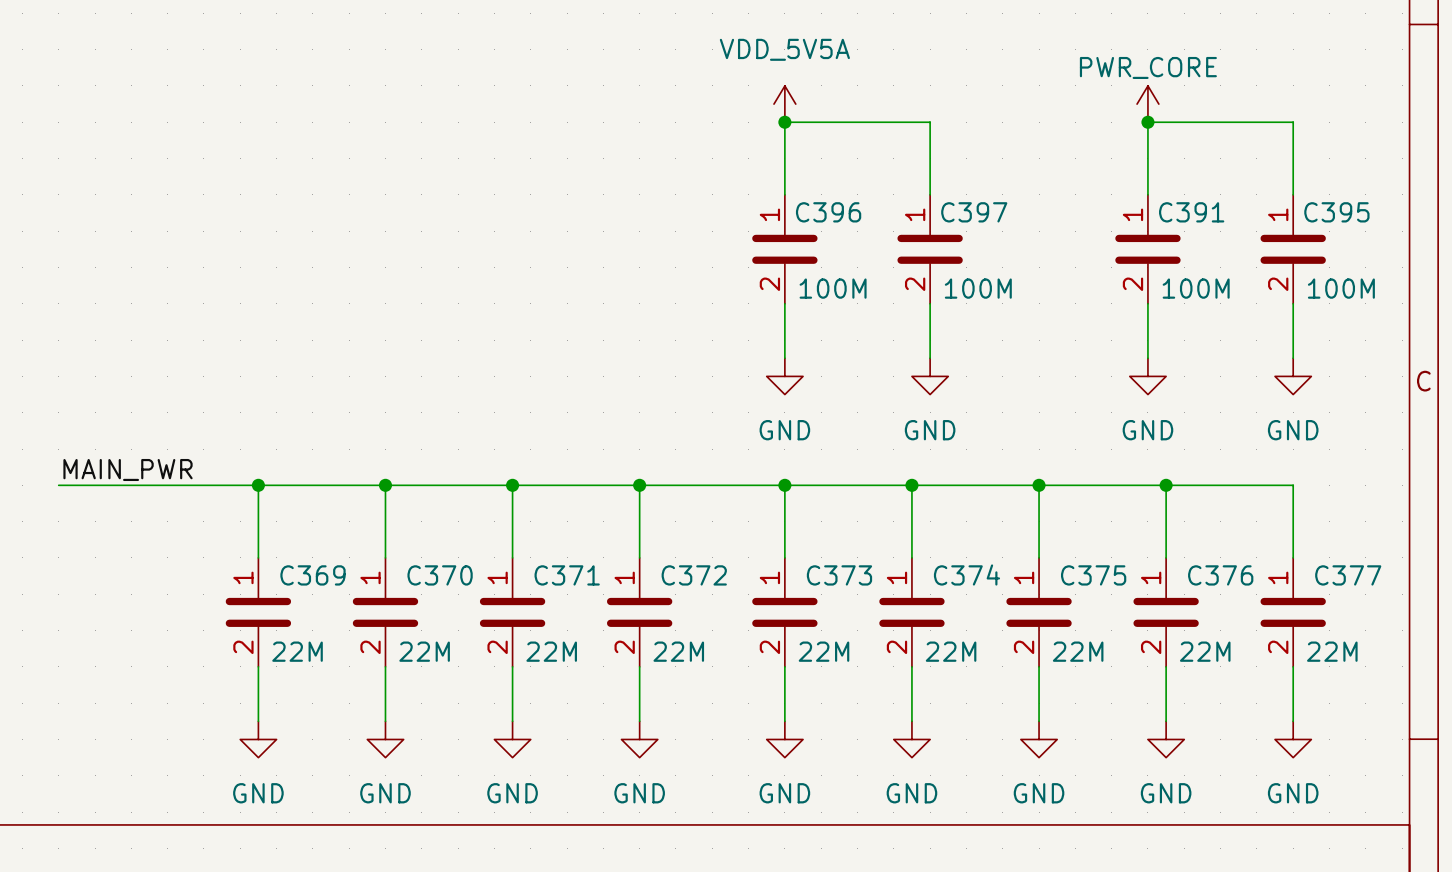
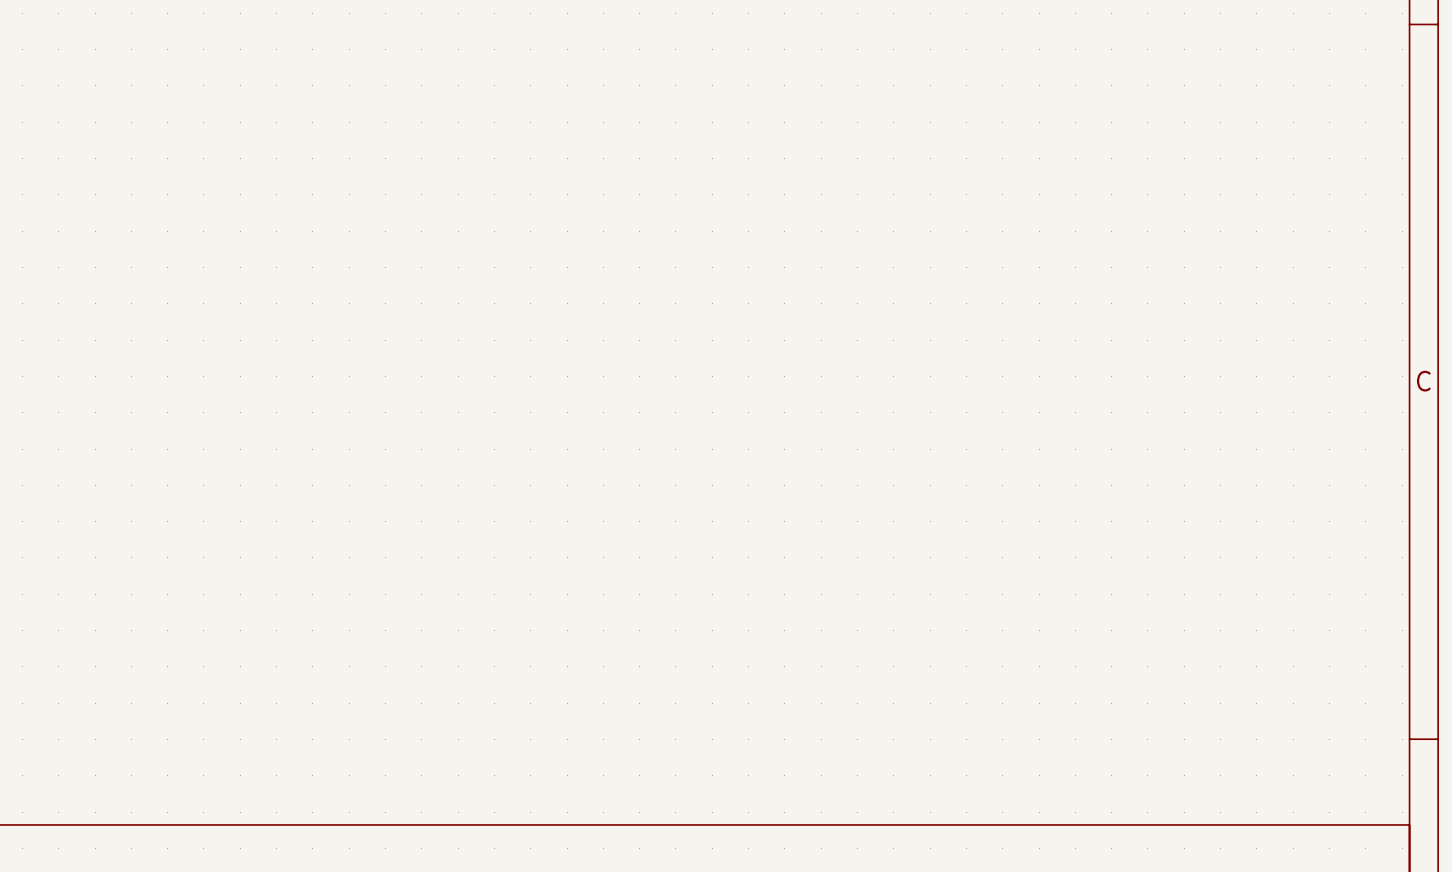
power symbol: VDD_5V5A (784, 104) -> none
power symbol: PWR_CORE (1147, 104) -> none
junction: (784, 122) -> none
junction: (1147, 122) -> none
wire: (784, 194) (784, 122) (930, 122) (930, 194) -> none
wire: (1147, 194) (1147, 122) (1293, 122) (1293, 194) -> none
C396: 100M (784, 249) -> none
C397: 100M (930, 249) -> none
C391: 100M (1147, 249) -> none
C395: 100M (1293, 249) -> none
wire: (784, 303) (784, 358) -> none
wire: (930, 303) (930, 358) -> none
wire: (1147, 303) (1147, 358) -> none
wire: (1293, 303) (1293, 358) -> none
power symbol: GND (784, 376) -> none
power symbol: GND (930, 376) -> none
power symbol: GND (1147, 376) -> none
power symbol: GND (1293, 376) -> none
label: MAIN_PWR (128, 469) -> none
wire: (58, 485) (1293, 485) (1293, 557) -> none
wire: (258, 485) (258, 557) -> none
junction: (258, 485) -> none
wire: (385, 485) (385, 557) -> none
junction: (385, 485) -> none
wire: (512, 485) (512, 557) -> none
junction: (512, 485) -> none
wire: (639, 485) (639, 557) -> none
junction: (639, 485) -> none
wire: (784, 485) (784, 557) -> none
junction: (784, 485) -> none
wire: (911, 485) (911, 557) -> none
junction: (911, 485) -> none
wire: (1039, 485) (1039, 557) -> none
junction: (1039, 485) -> none
wire: (1166, 485) (1166, 557) -> none
junction: (1166, 485) -> none
C369: 22M (258, 612) -> none
C370: 22M (385, 612) -> none
C371: 22M (512, 612) -> none
C372: 22M (639, 612) -> none
C373: 22M (784, 612) -> none
C374: 22M (911, 612) -> none
C375: 22M (1039, 612) -> none
C376: 22M (1166, 612) -> none
C377: 22M (1293, 612) -> none
wire: (258, 666) (258, 721) -> none
wire: (385, 666) (385, 721) -> none
wire: (512, 666) (512, 721) -> none
wire: (639, 666) (639, 721) -> none
wire: (784, 666) (784, 721) -> none
wire: (911, 666) (911, 721) -> none
wire: (1039, 666) (1039, 721) -> none
wire: (1166, 666) (1166, 721) -> none
wire: (1293, 666) (1293, 721) -> none
power symbol: GND (258, 739) -> none
power symbol: GND (385, 739) -> none
power symbol: GND (512, 739) -> none
power symbol: GND (639, 739) -> none
power symbol: GND (784, 739) -> none
power symbol: GND (911, 739) -> none
power symbol: GND (1039, 739) -> none
power symbol: GND (1166, 739) -> none
power symbol: GND (1293, 739) -> none

